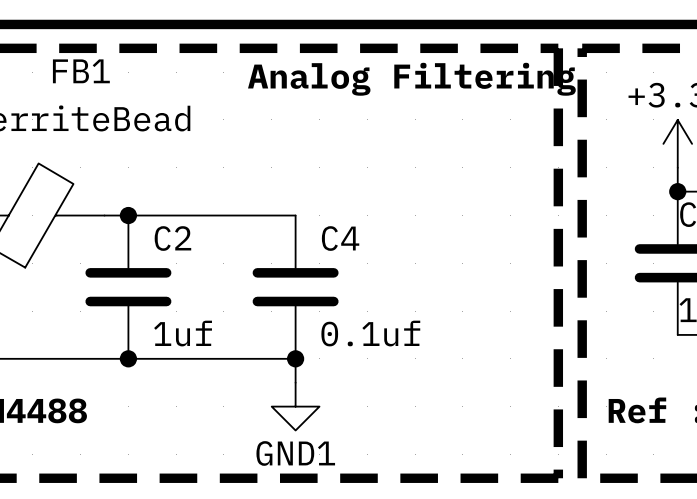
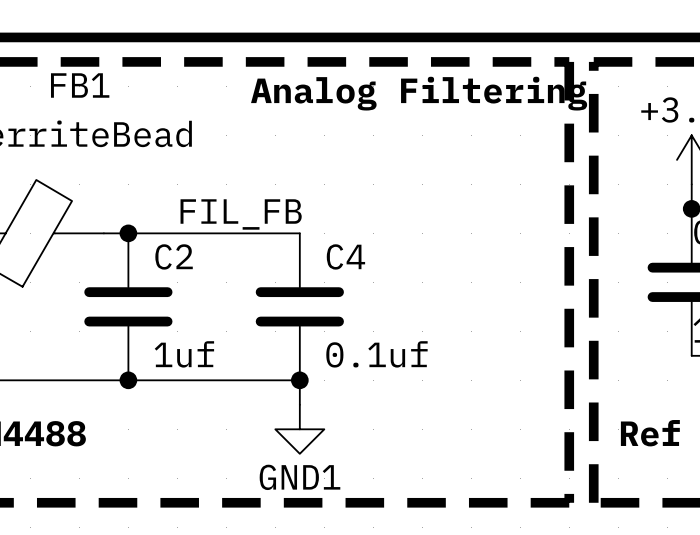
label: none -> FIL_FB (241, 214)

